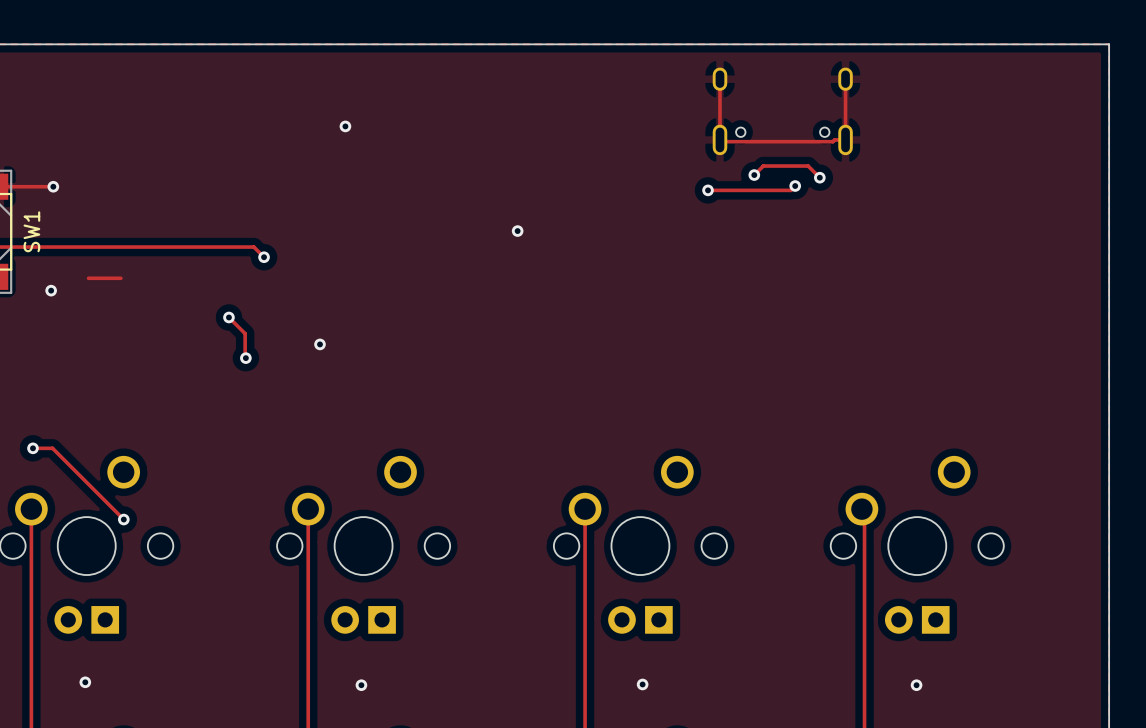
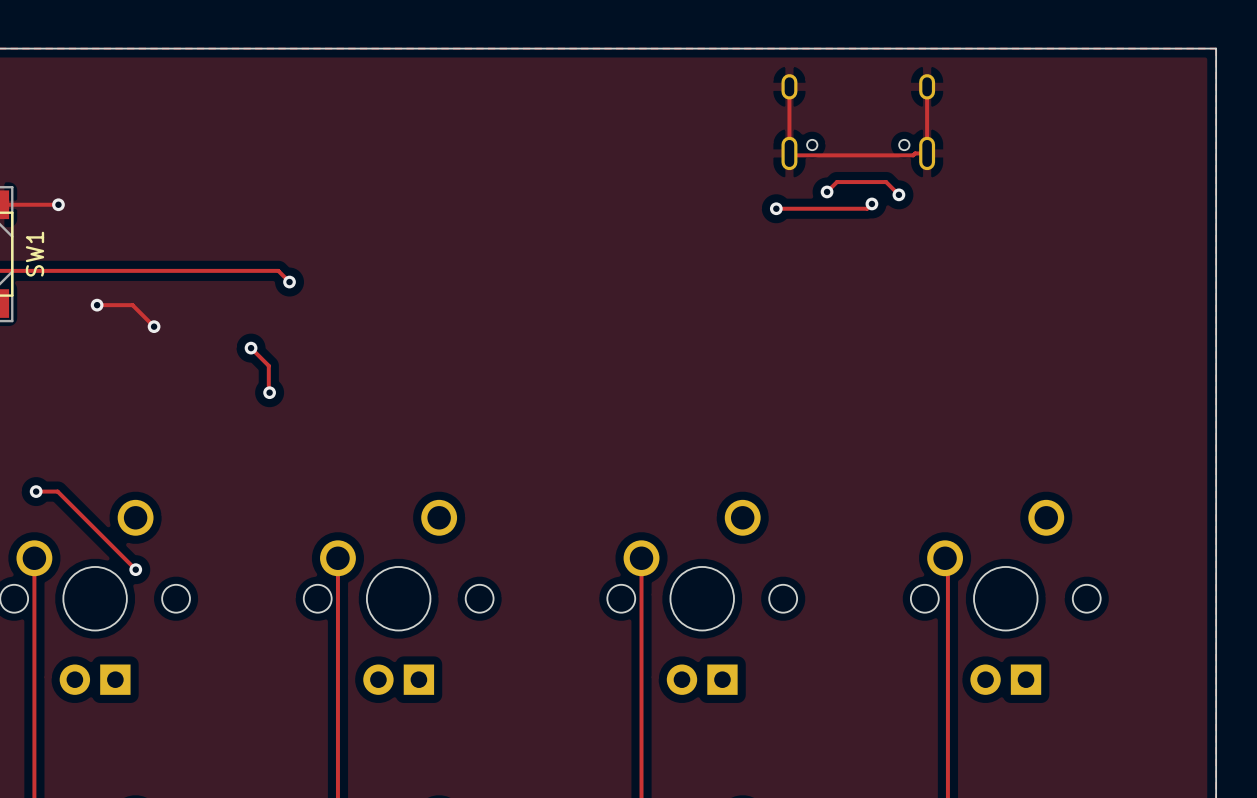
via: (345, 126) -> none
via: (517, 231) -> none
track: none -> (132, 305) (154, 326)
via position: (51, 290) -> (97, 305)
via: none -> (154, 326)
via: (319, 344) -> none
via: (85, 682) -> none
via: (642, 684) -> none
via: (361, 685) -> none
via: (916, 685) -> none

